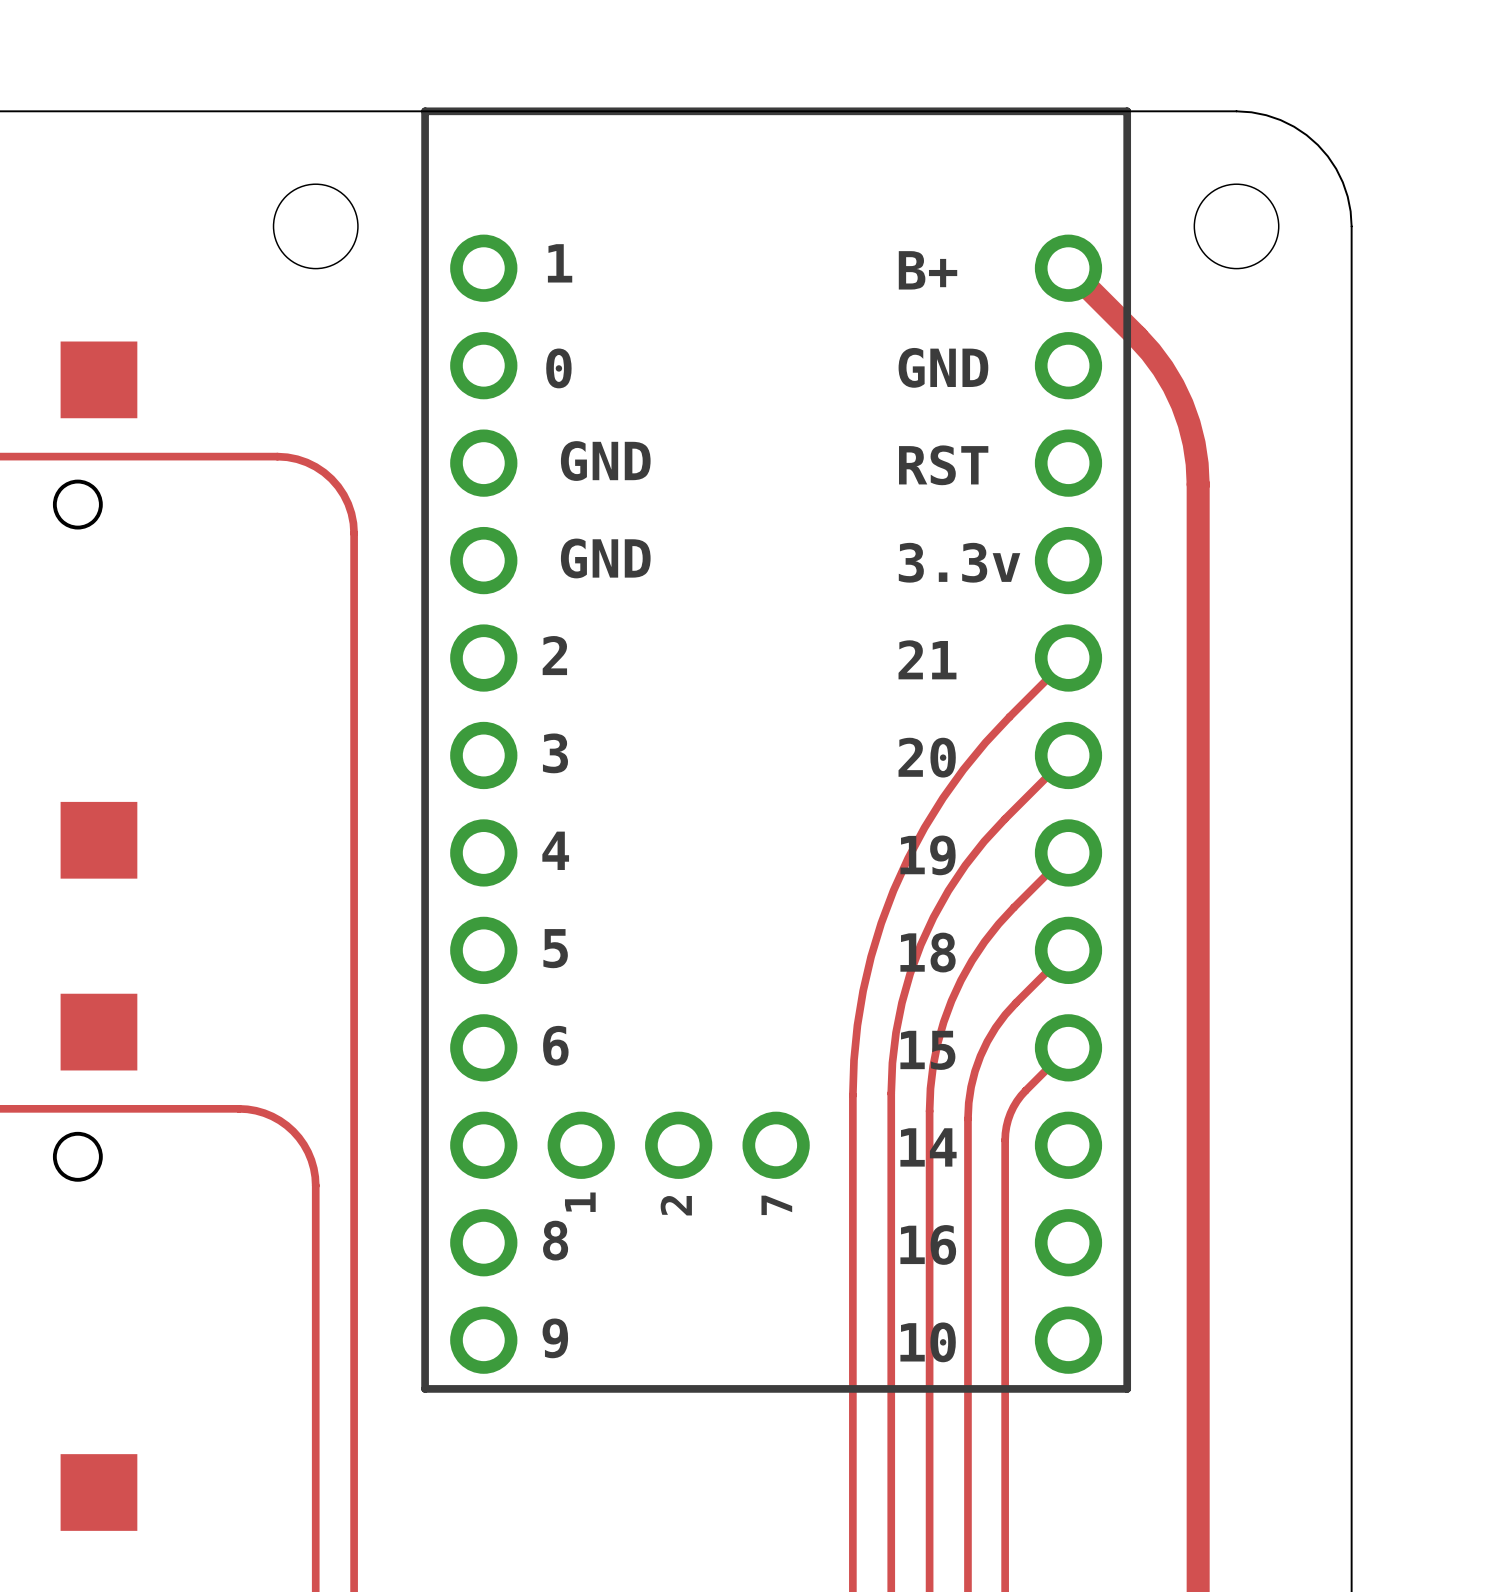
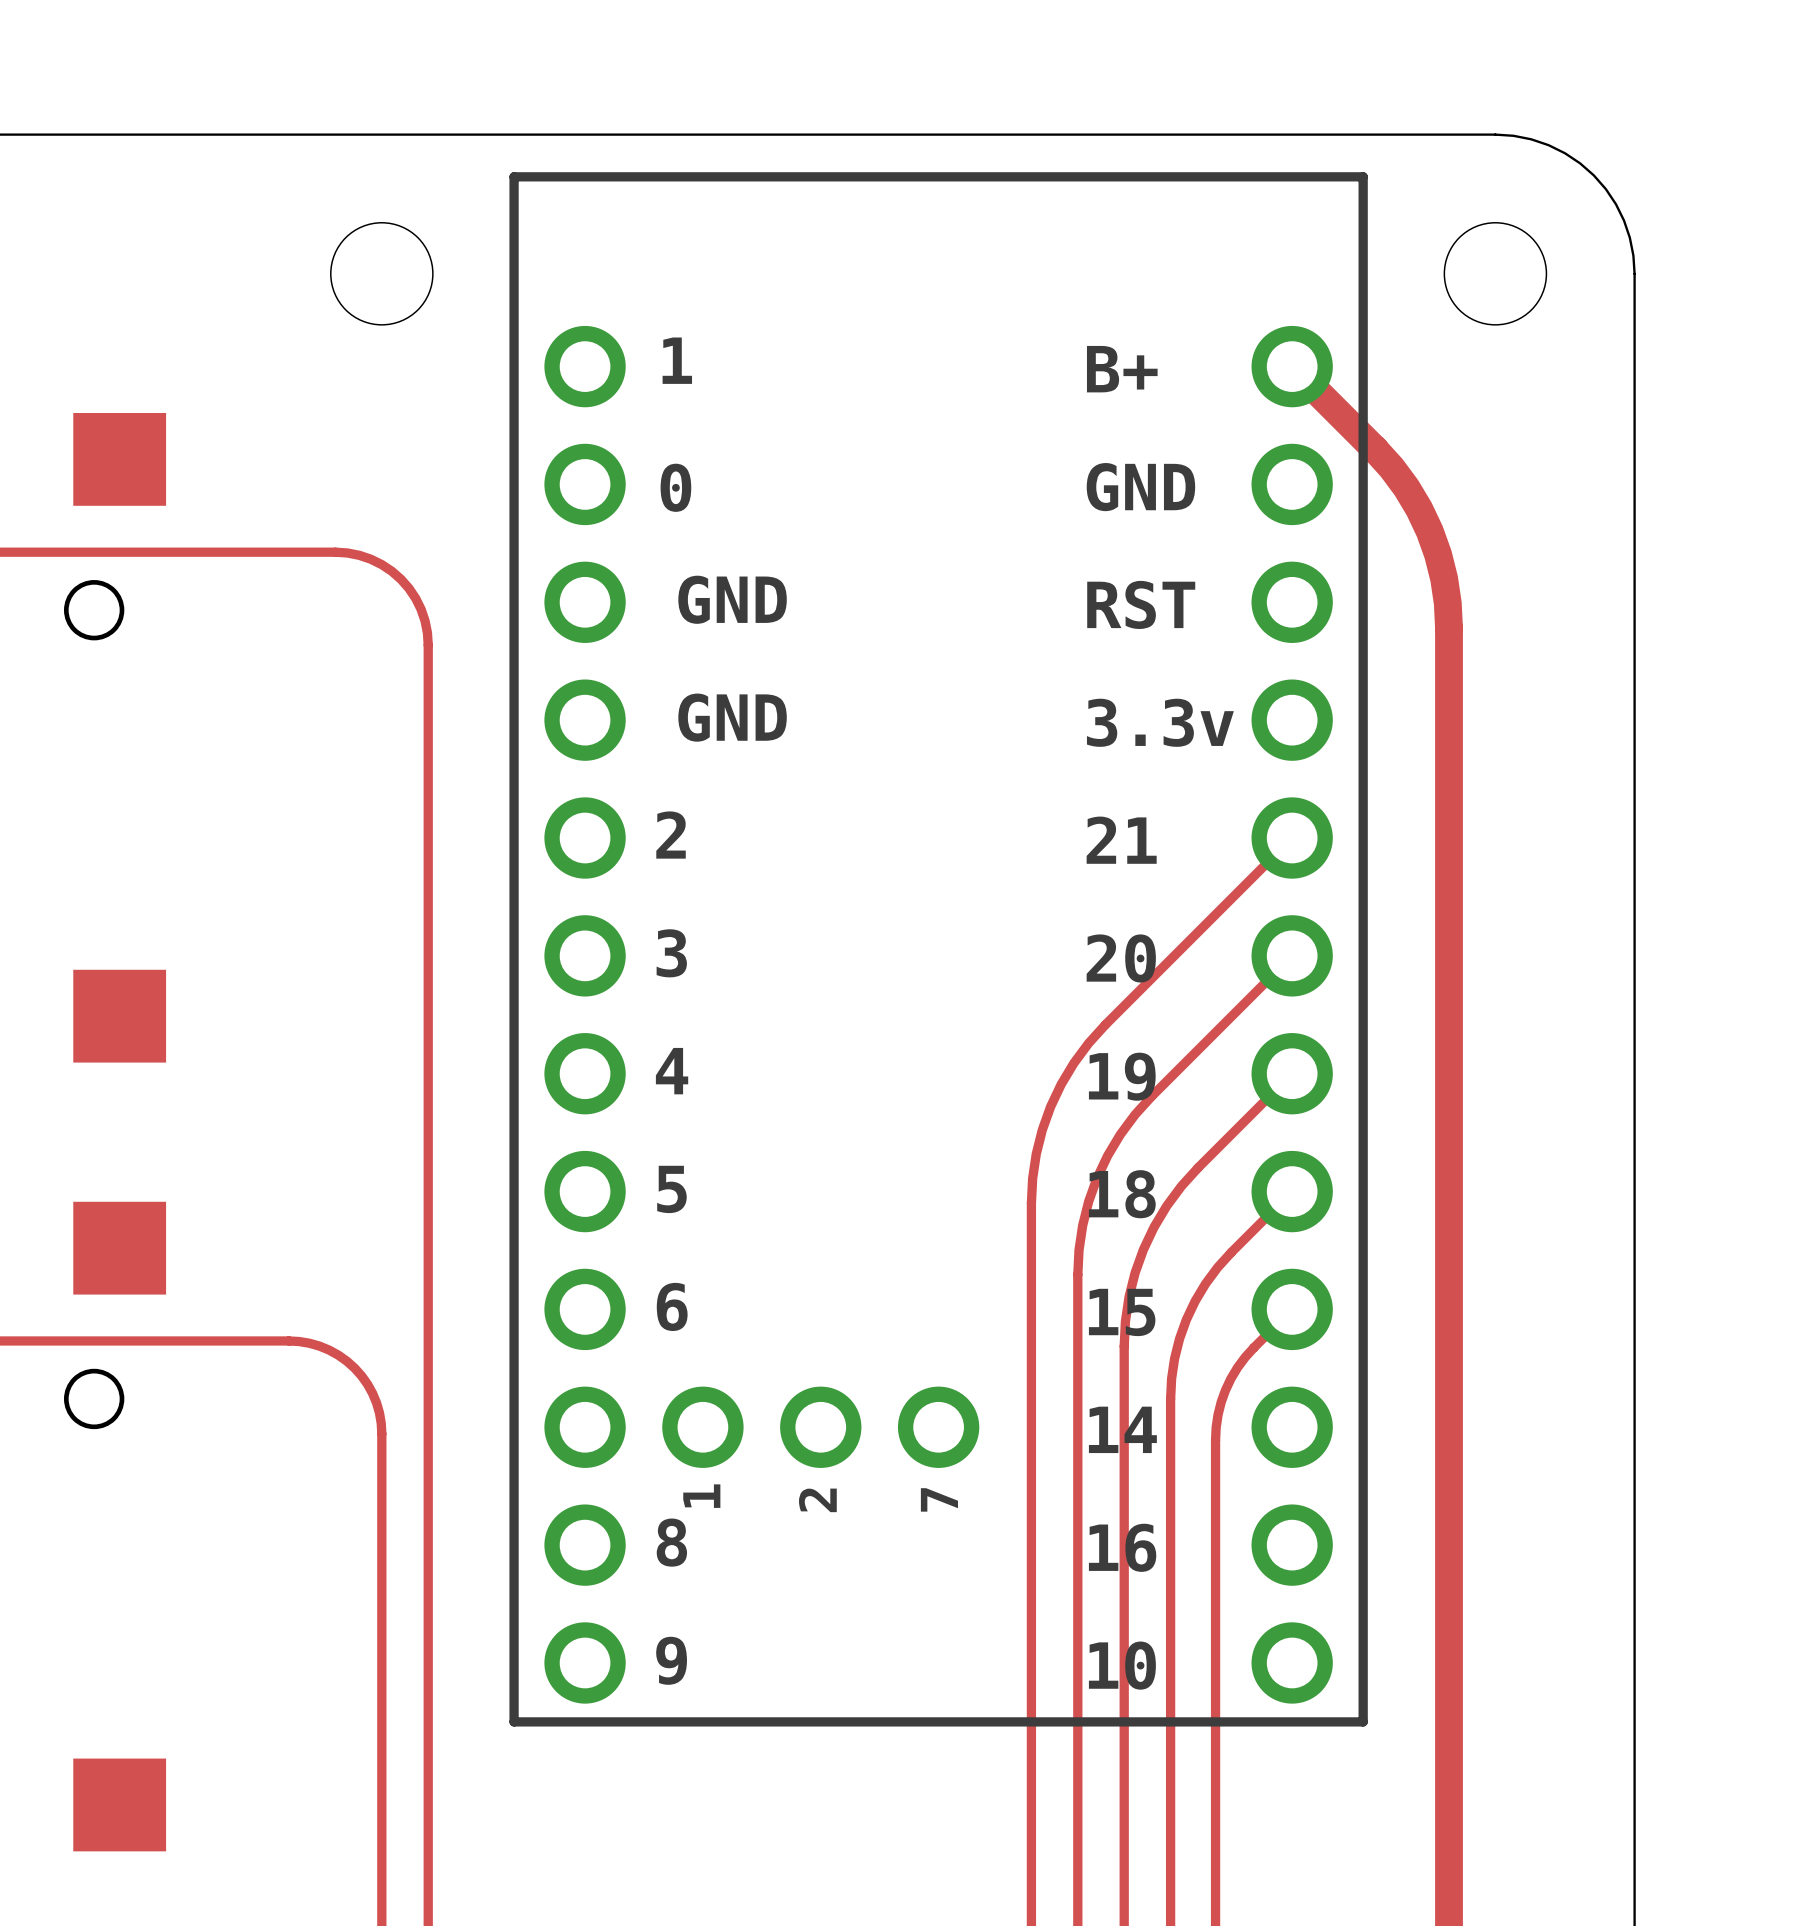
track: (1068, 268) (1150, 351) (1173, 385) (1182, 404) (1194, 443) (1197, 463) (1198, 519) -> (1292, 366) (1375, 449) (1406, 487) (1429, 531) (1438, 554) (1444, 578) (1449, 628)
track: (1068, 658) (1009, 716) (963, 769) (924, 827) (908, 858) (881, 923) (863, 990) (854, 1060) (852, 1095) -> (1292, 838) (1105, 1024) (1088, 1043) (1061, 1084) (1042, 1130) (1032, 1178) (1031, 1324)
part position: (776, 750) -> (938, 949)
track: (1068, 755) (984, 841) (965, 865) (933, 917) (920, 944) (901, 1002) (892, 1063) (891, 1093) -> (1292, 955) (1151, 1096) (1135, 1114) (1107, 1155) (1097, 1178) (1082, 1225) (1079, 1250) (1077, 1322)
track: (1068, 854) (998, 924) (972, 960) (961, 980) (951, 1000) (937, 1043) (930, 1088) (929, 1113) -> (1291, 1074) (1198, 1167) (1166, 1205) (1143, 1249) (1135, 1272) (1129, 1297) (1124, 1346)
track: (1068, 950) (1005, 1014) (987, 1041) (980, 1056) (971, 1086) (967, 1118) (967, 1156) -> (1292, 1191) (1217, 1267) (1195, 1301) (1179, 1338) (1174, 1358) (1170, 1399)
track: (1068, 1047) (1021, 1095) (1010, 1113) (1005, 1133) (1005, 1190) -> (1292, 1309) (1245, 1357) (1231, 1378) (1218, 1414) (1215, 1440)

